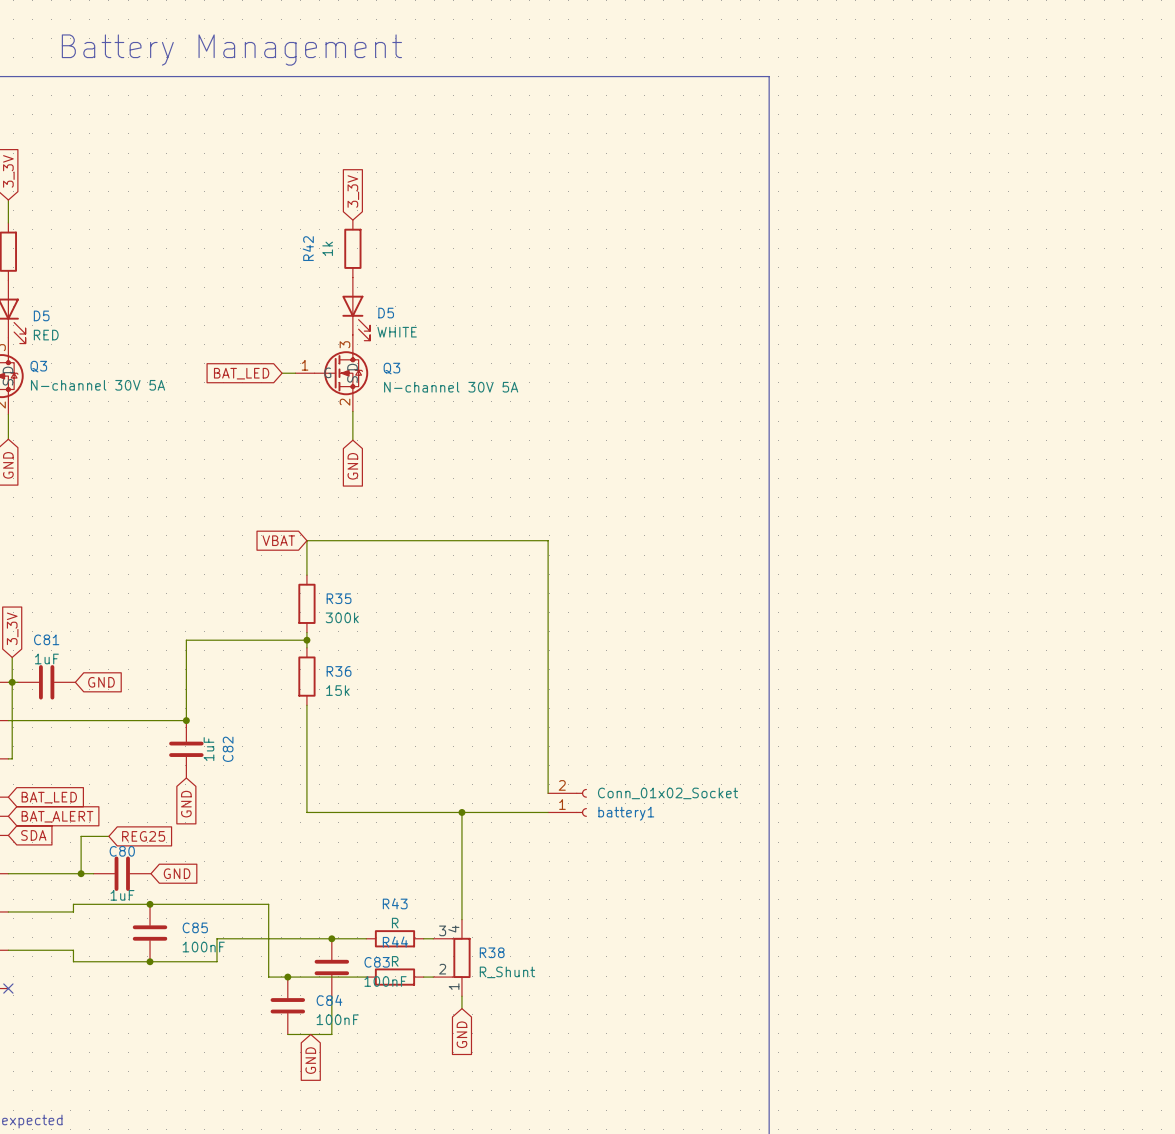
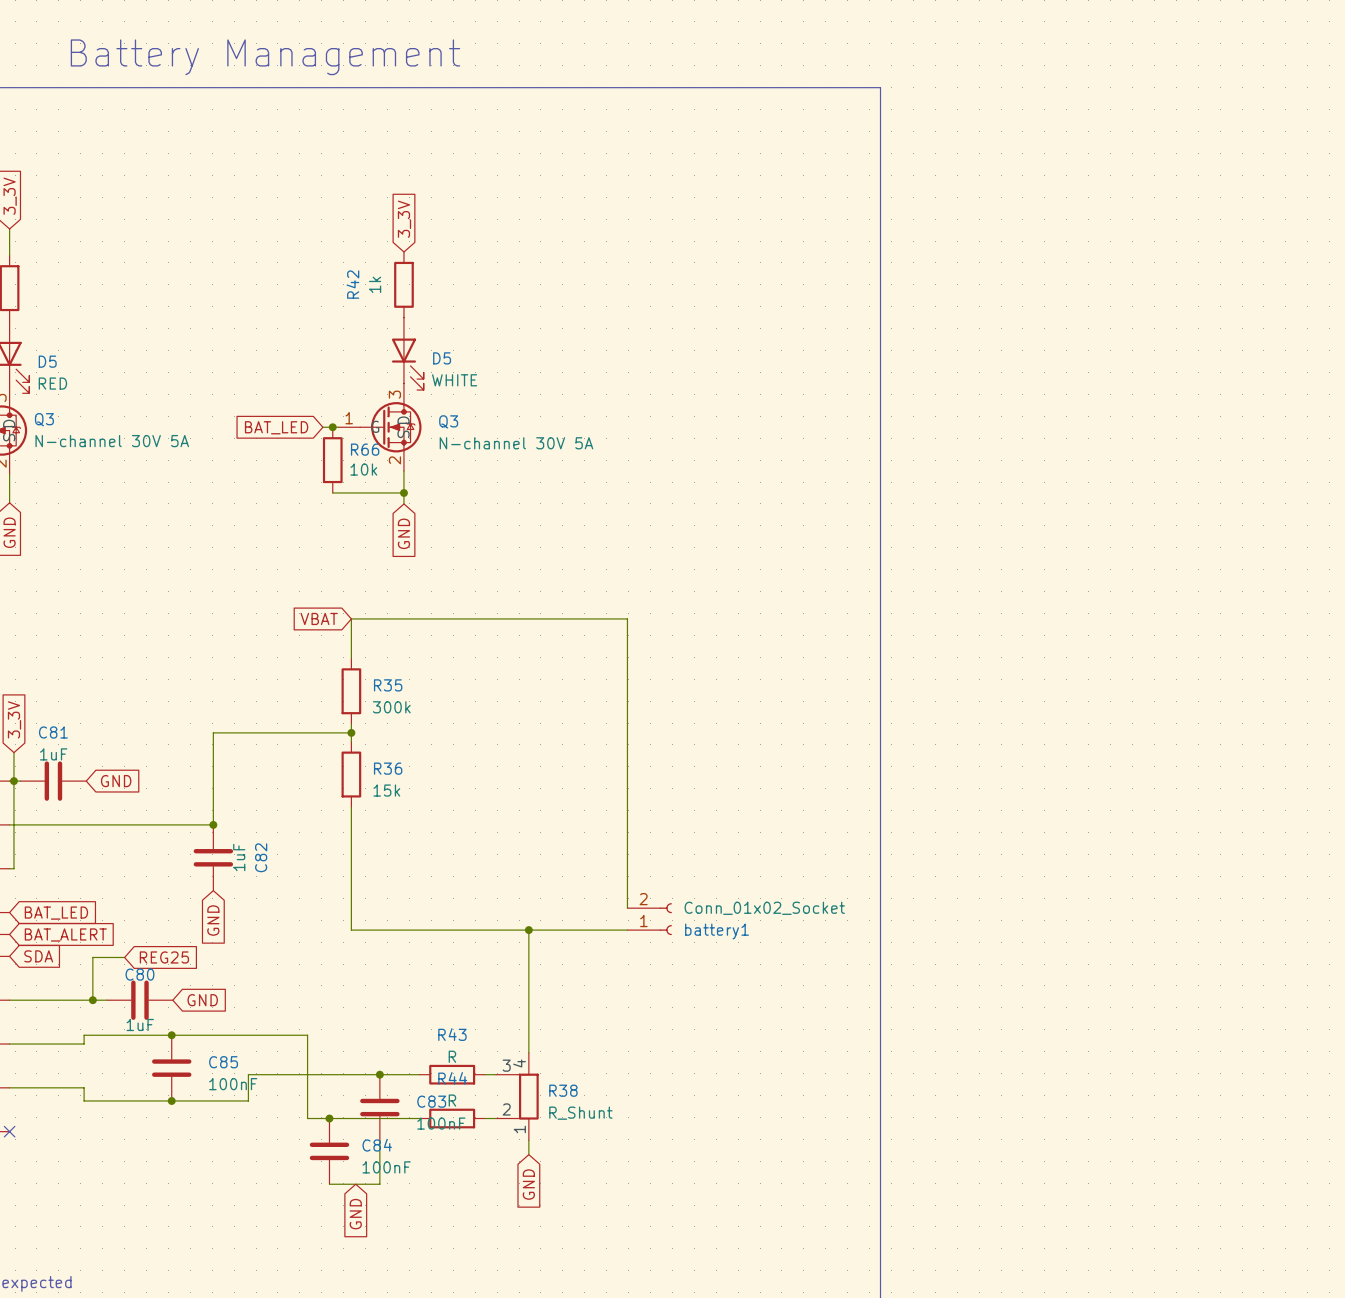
junction: none -> (332, 427)
R66: none -> 10k (332, 460)
wire: none -> (332, 492) (403, 492)
junction: none -> (403, 492)

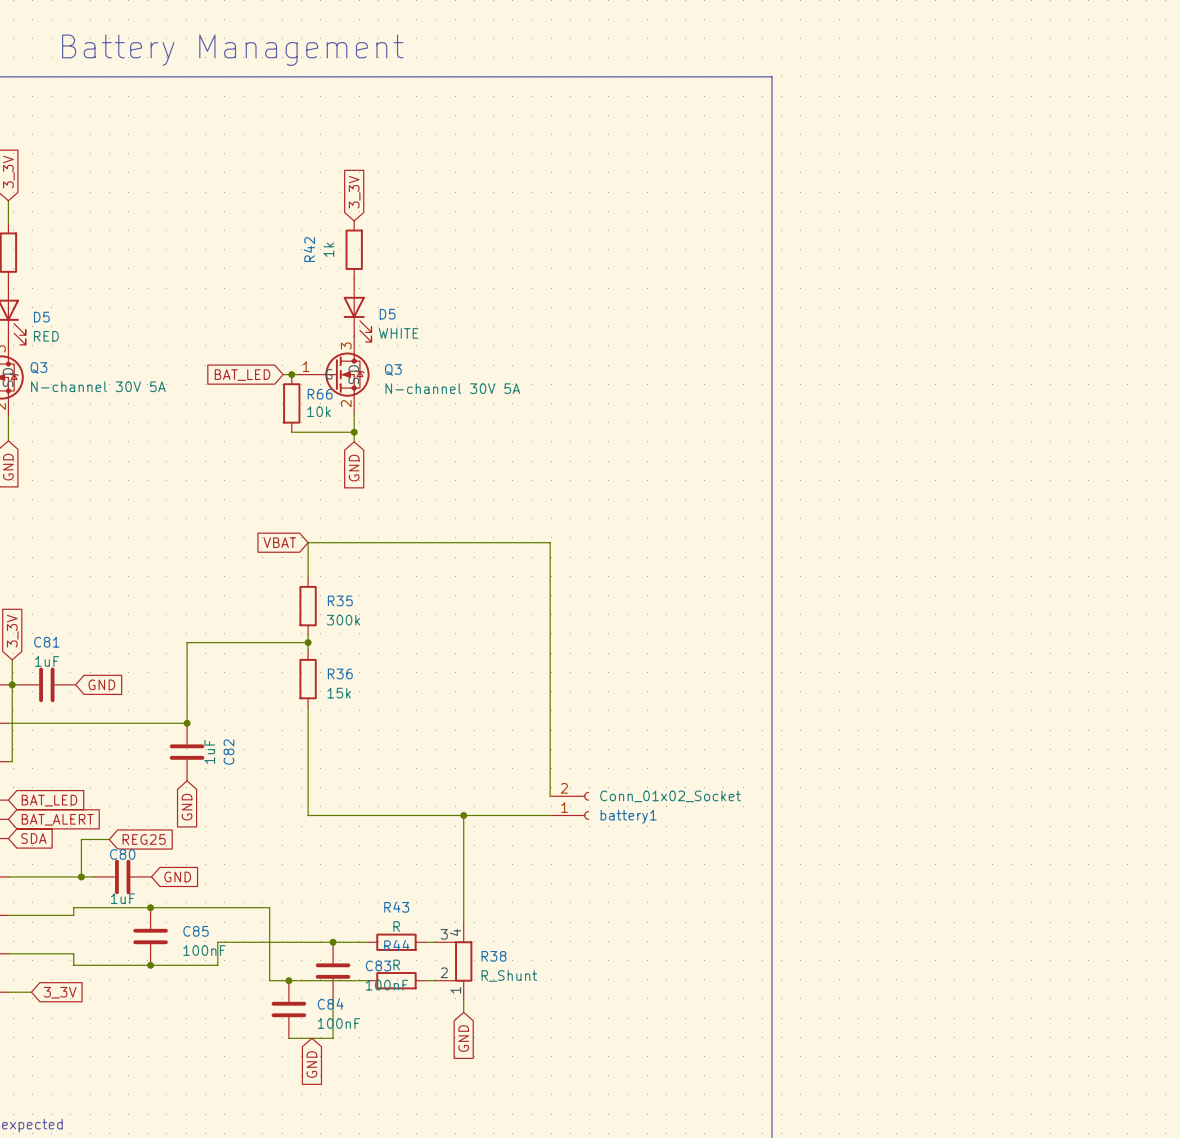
wire: none -> (8, 992) (31, 992)
no-connect mark: (9, 1131) -> none
global label: none -> 3_3V (60, 992)

